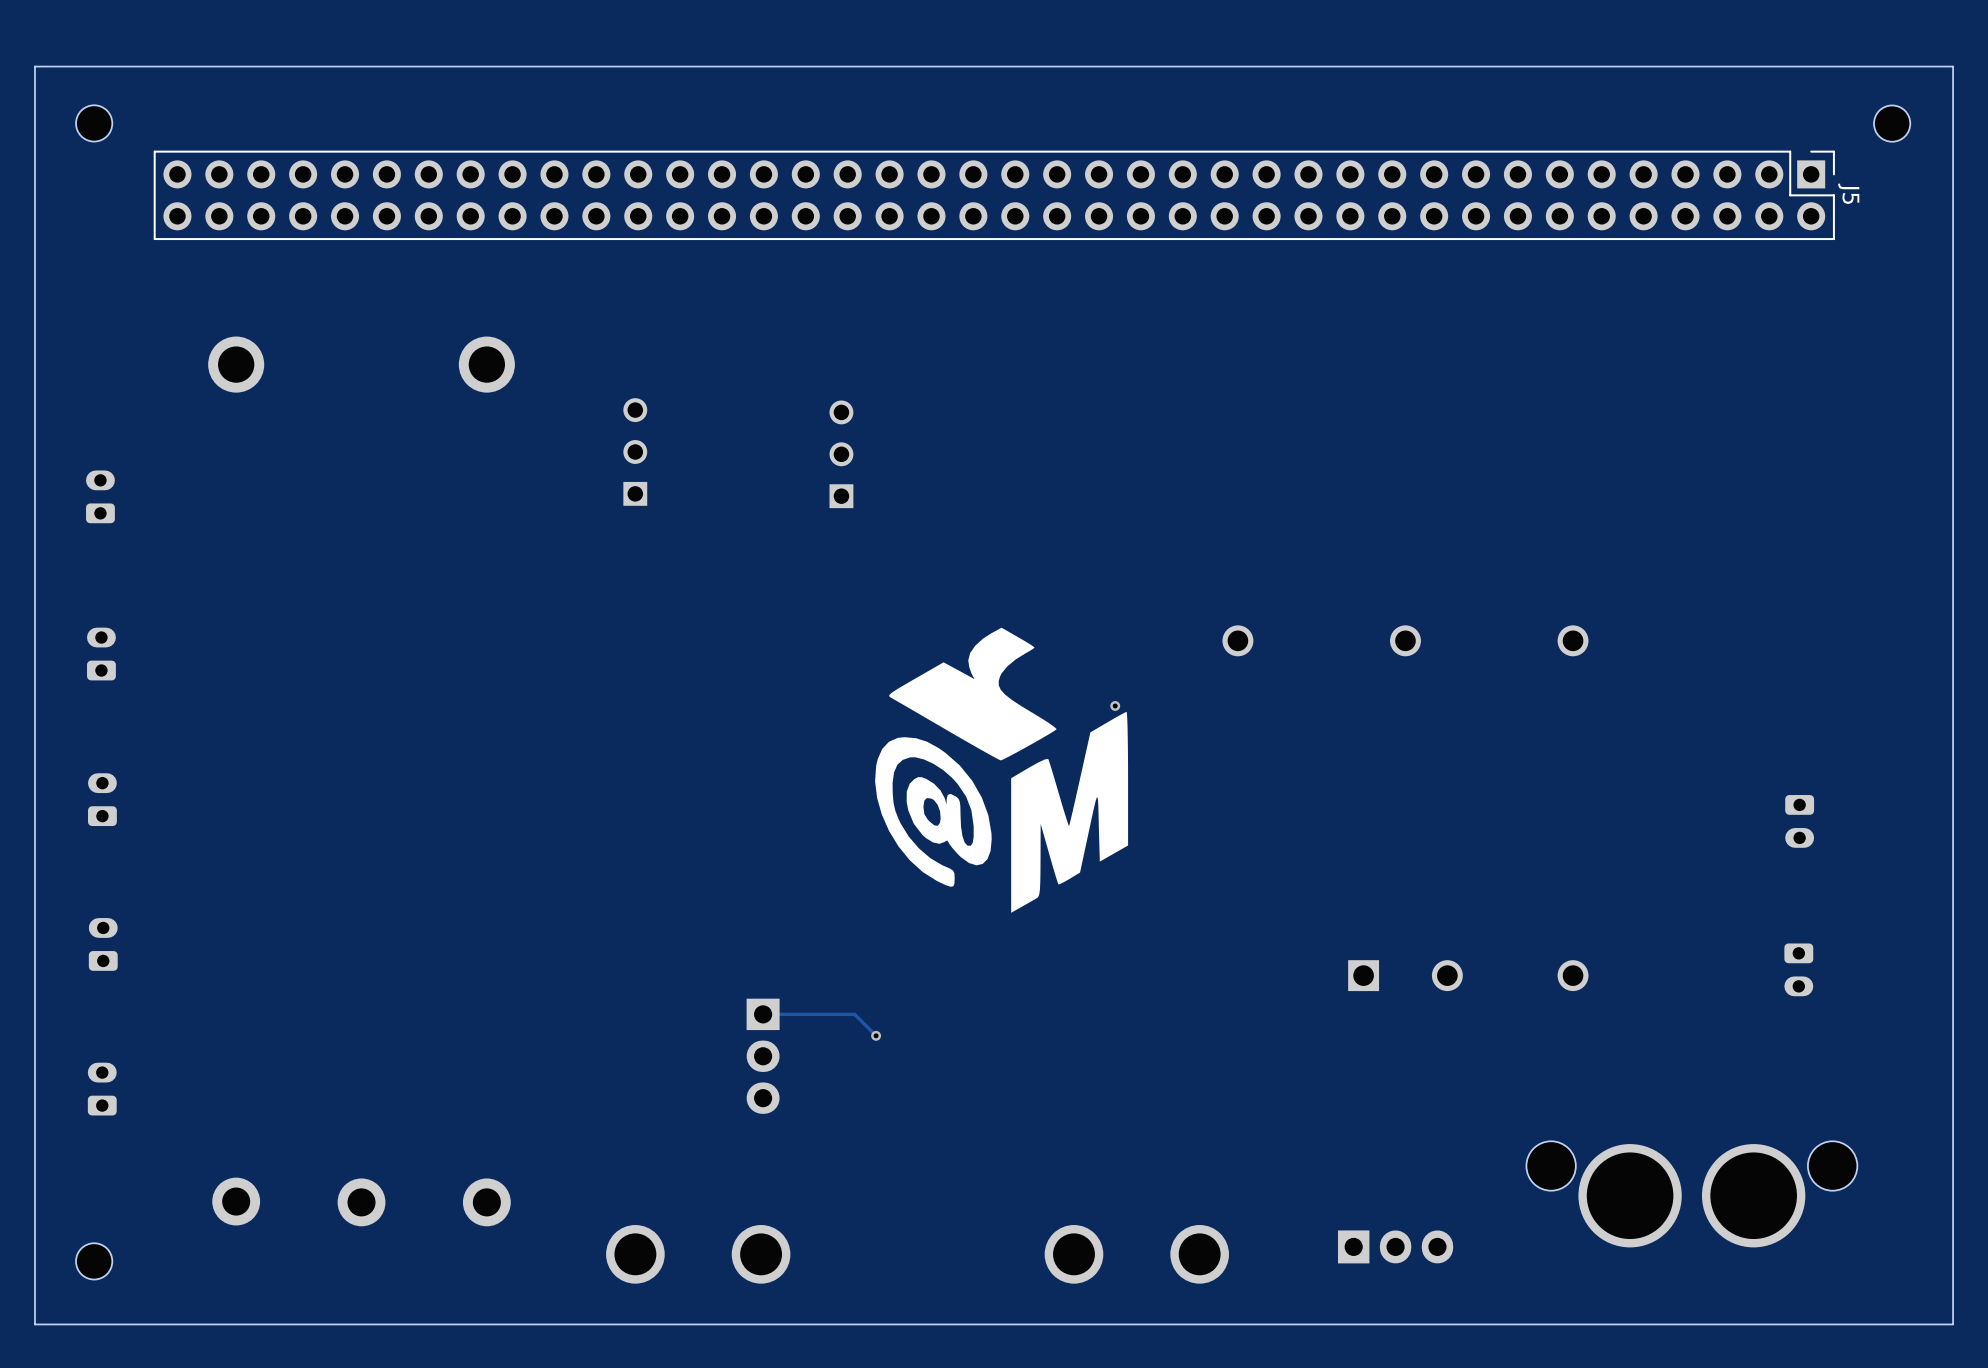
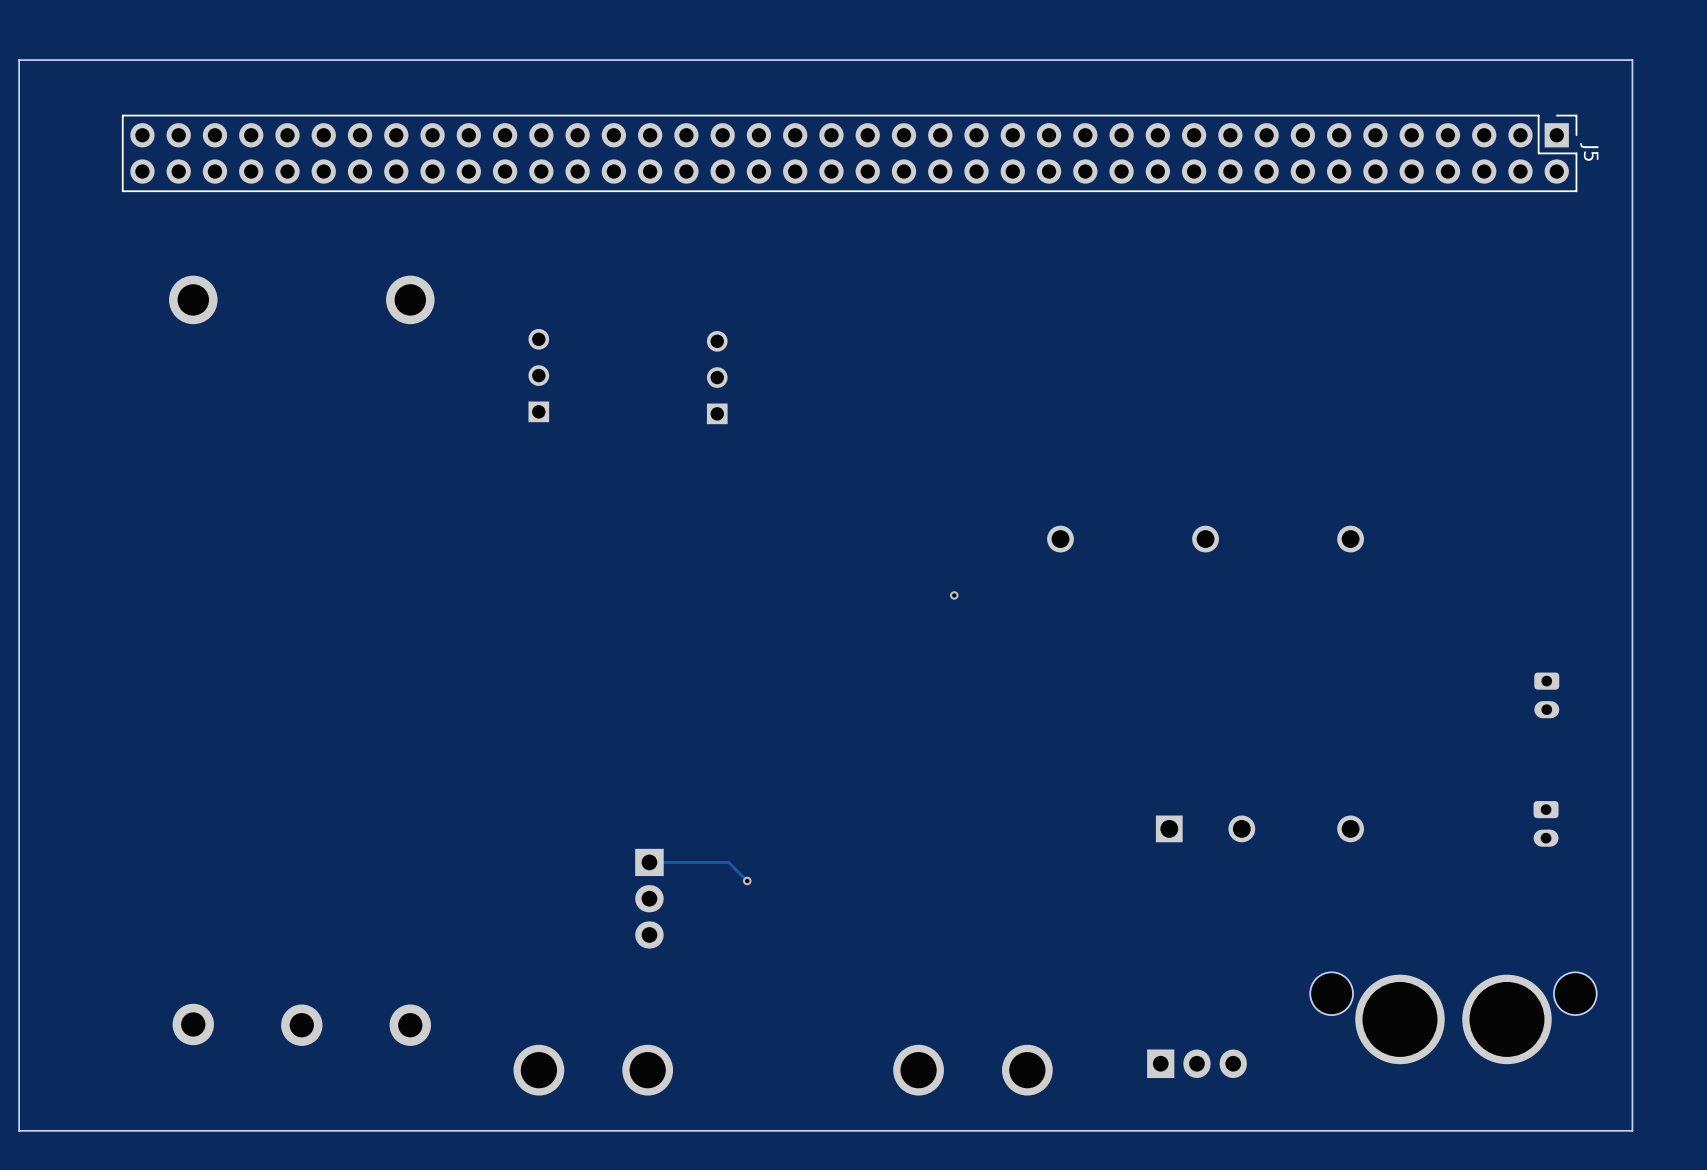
board edge: (34, 87) (34, 66) (1953, 66) (1953, 1324) (1898, 1324) -> (19, 60) (1632, 60) (1632, 1130)
part: (94, 123) -> none
part: (1892, 123) -> none
part: (100, 496) -> none
drawing: [875, 627, 1129, 913] -> none
part: (101, 654) -> none
part: (102, 799) -> none
part: (103, 944) -> none
part: (102, 1089) -> none
part: (94, 1261) -> none

